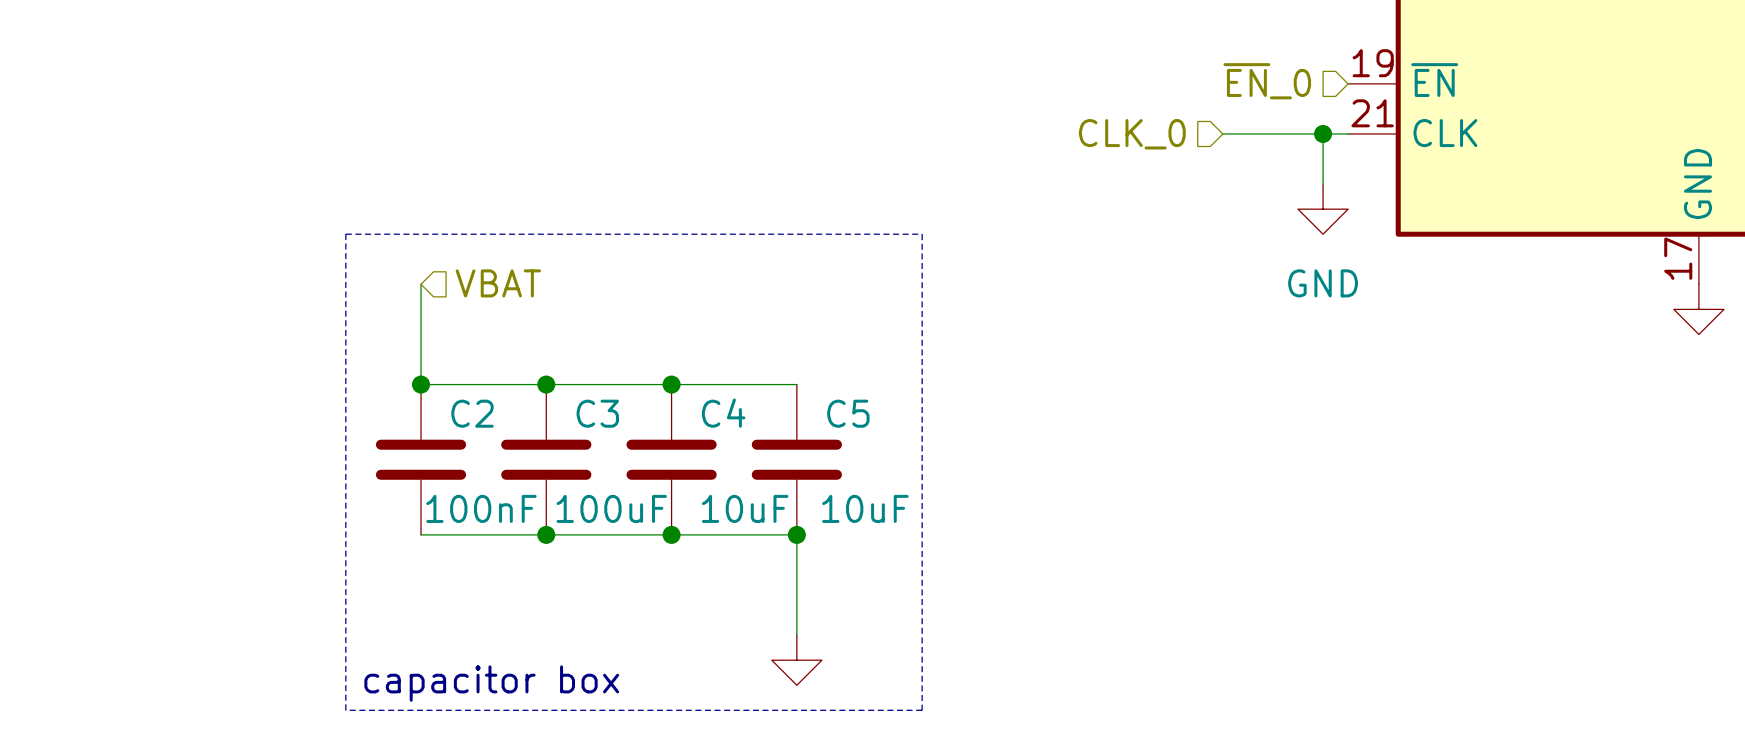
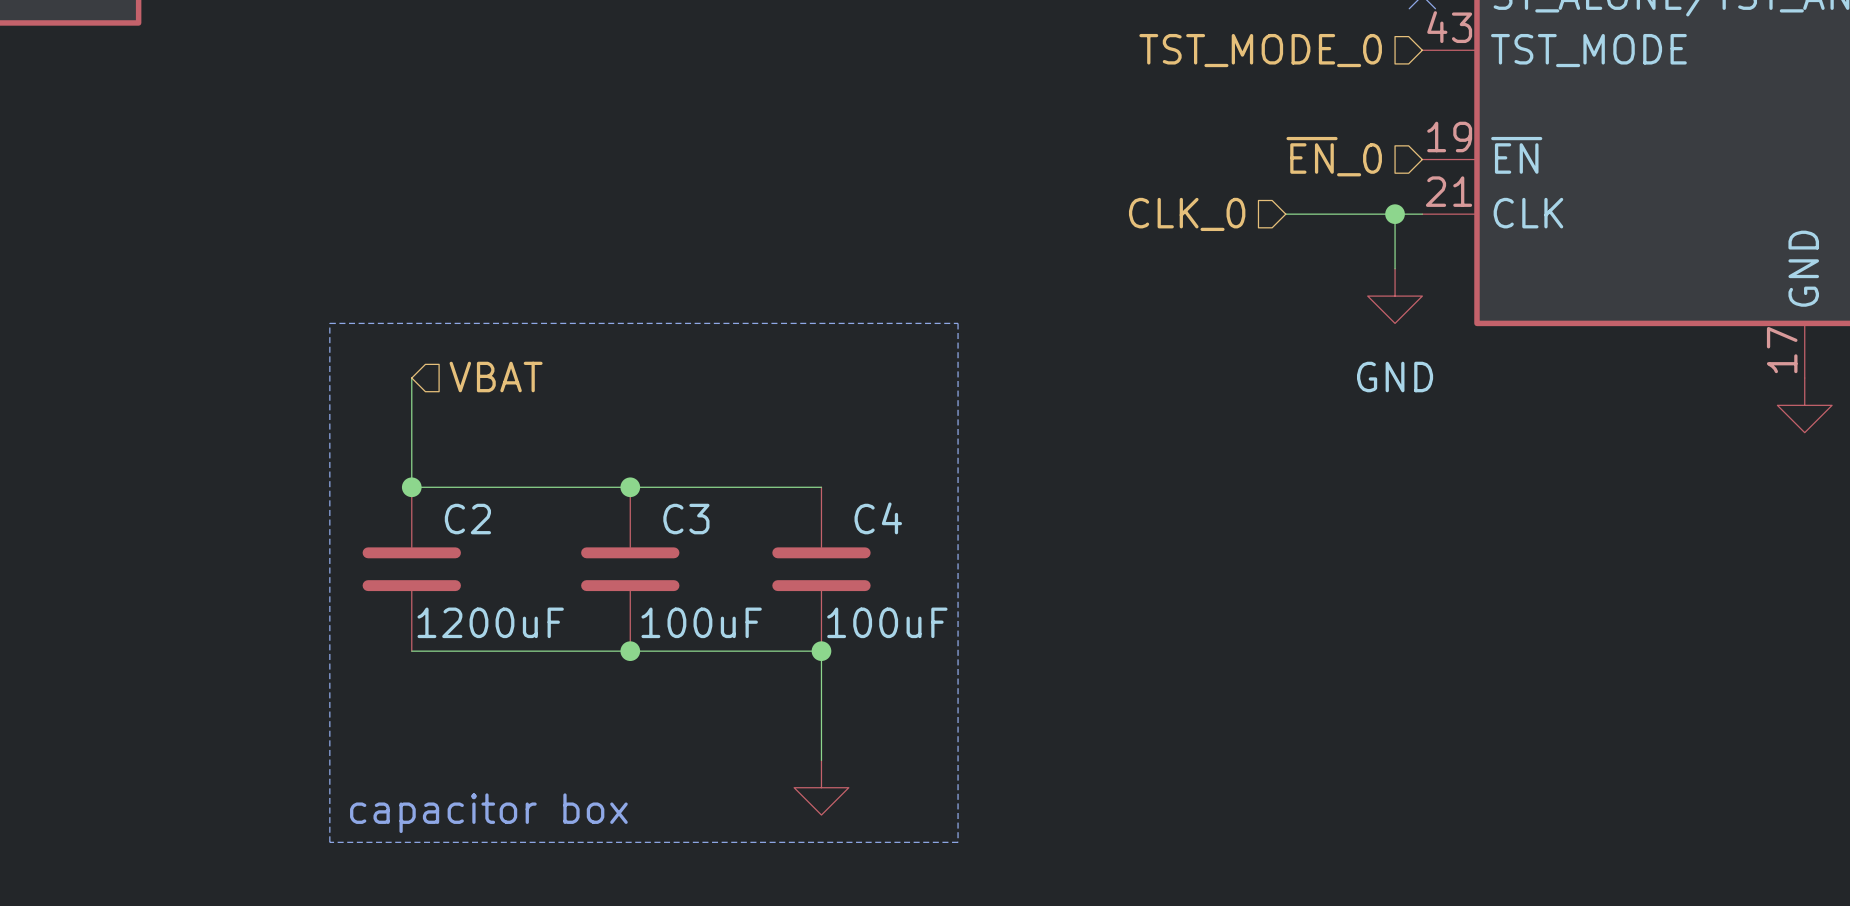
junction: (546, 384) -> none
junction: none -> (630, 487)
junction: (671, 384) -> none
C5 name: C5 (848, 413) -> C4 (878, 518)
C3 position: (546, 459) -> (630, 569)
C4: 10uF (671, 459) -> none
C2 value: 100nF (481, 508) -> 1200uF (490, 622)
C5 value: 10uF (865, 508) -> 100uF (887, 622)
junction: (546, 534) -> none
junction: none -> (630, 651)
junction: (671, 534) -> none

